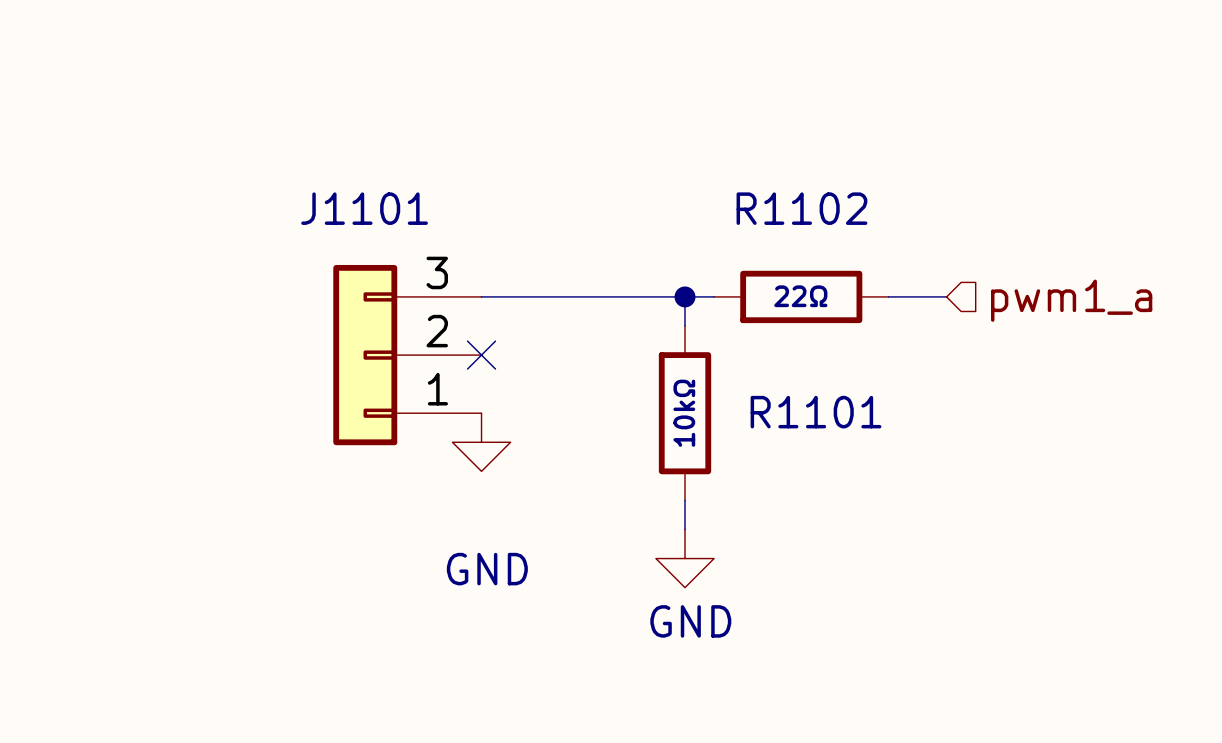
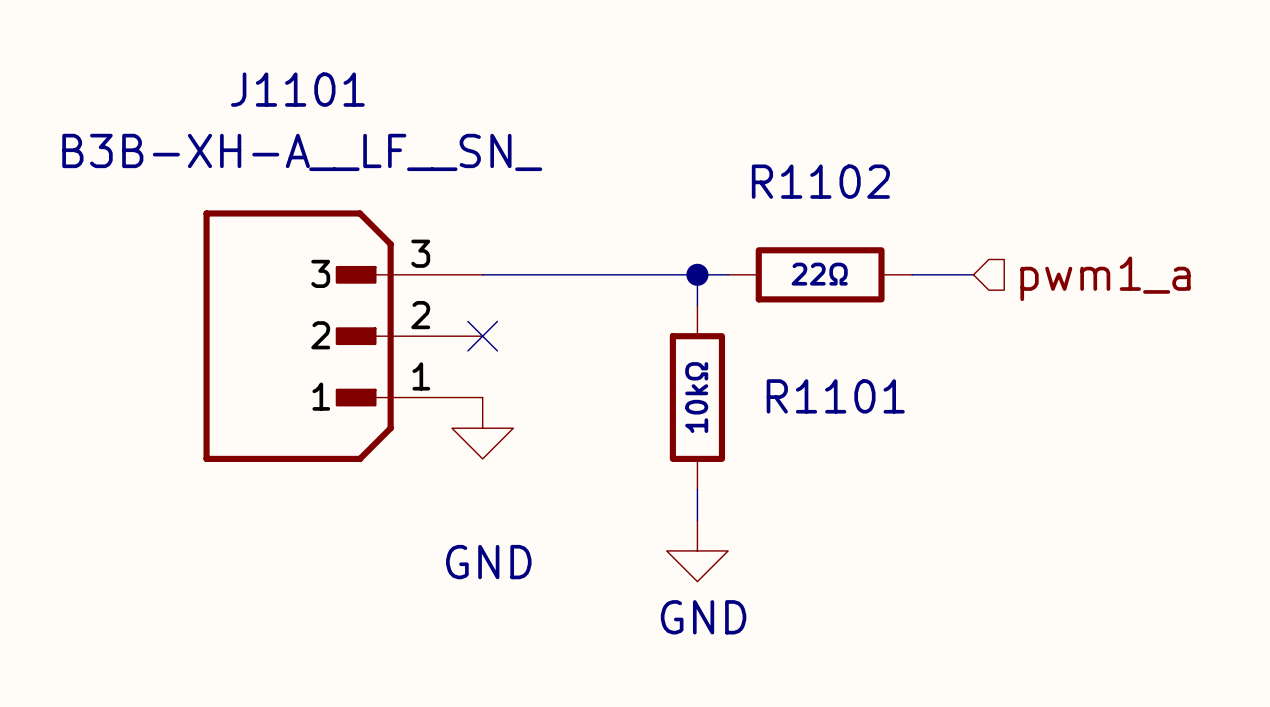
J1101 value: none -> B3B-XH-A__LF__SN_ (302, 152)
J1101 name position: J1101 (364, 208) -> J1101 (297, 89)
J1101 symbol: [333, 264, 482, 446] -> [203, 210, 483, 462]

